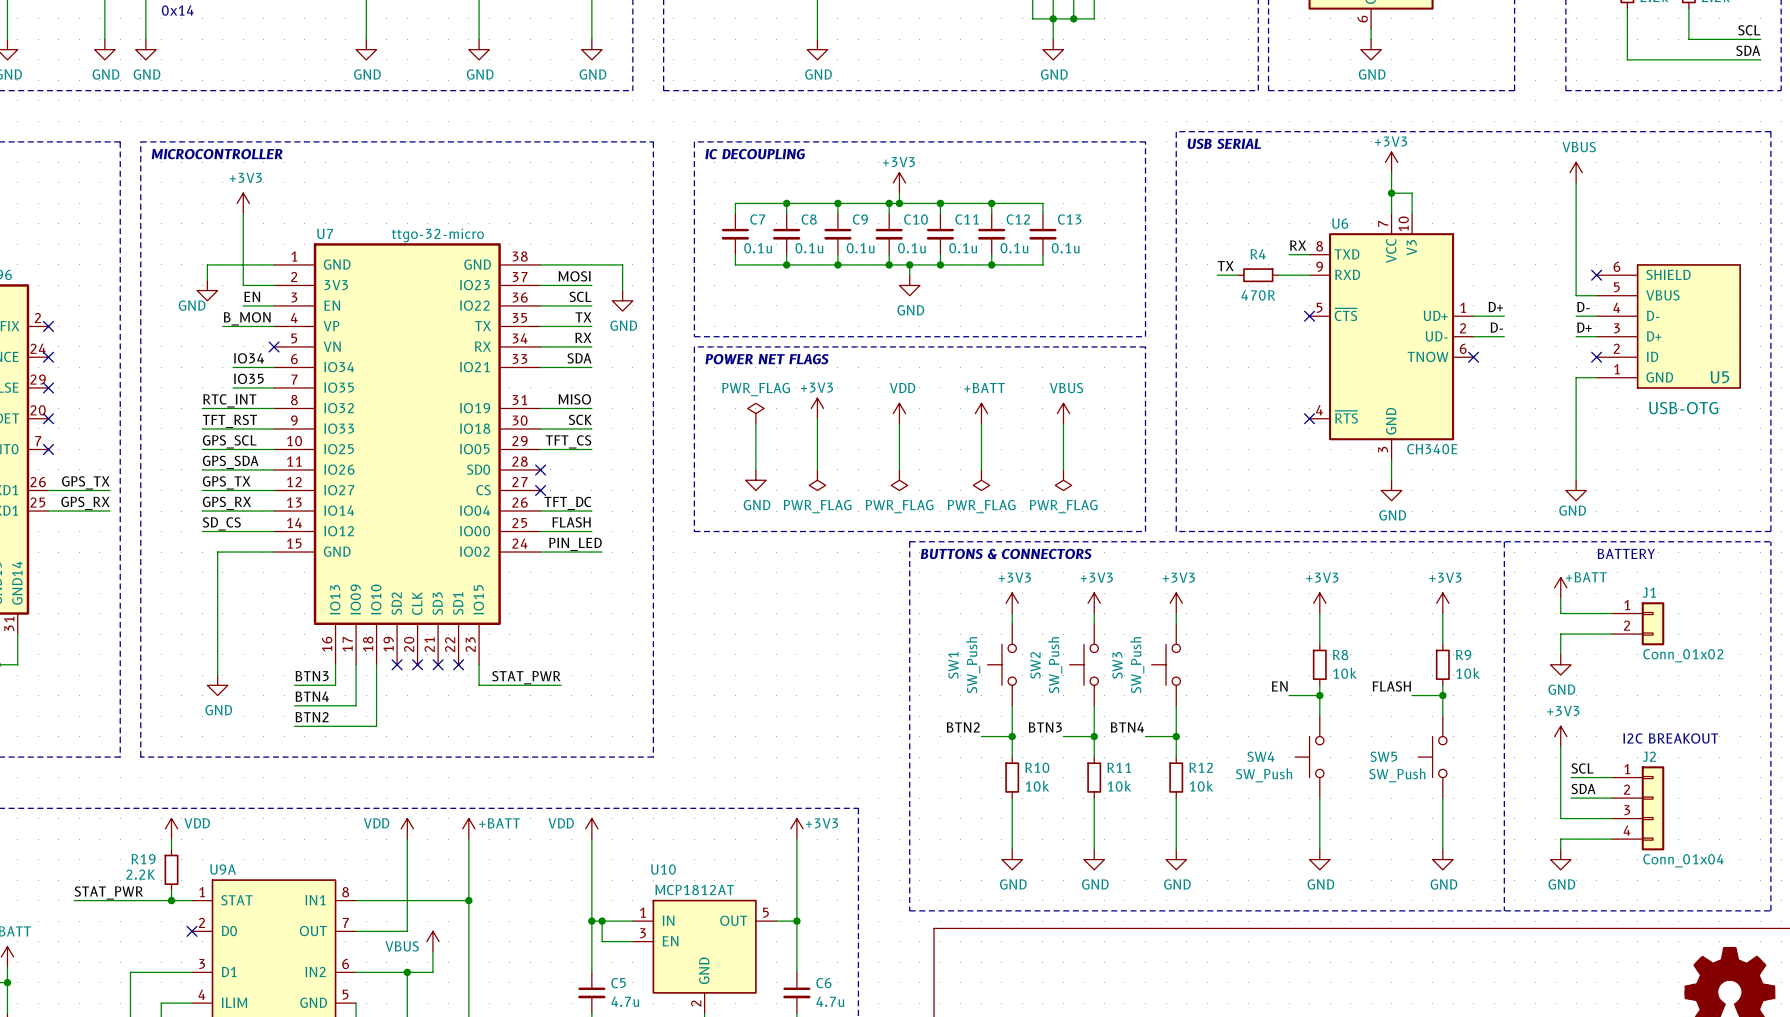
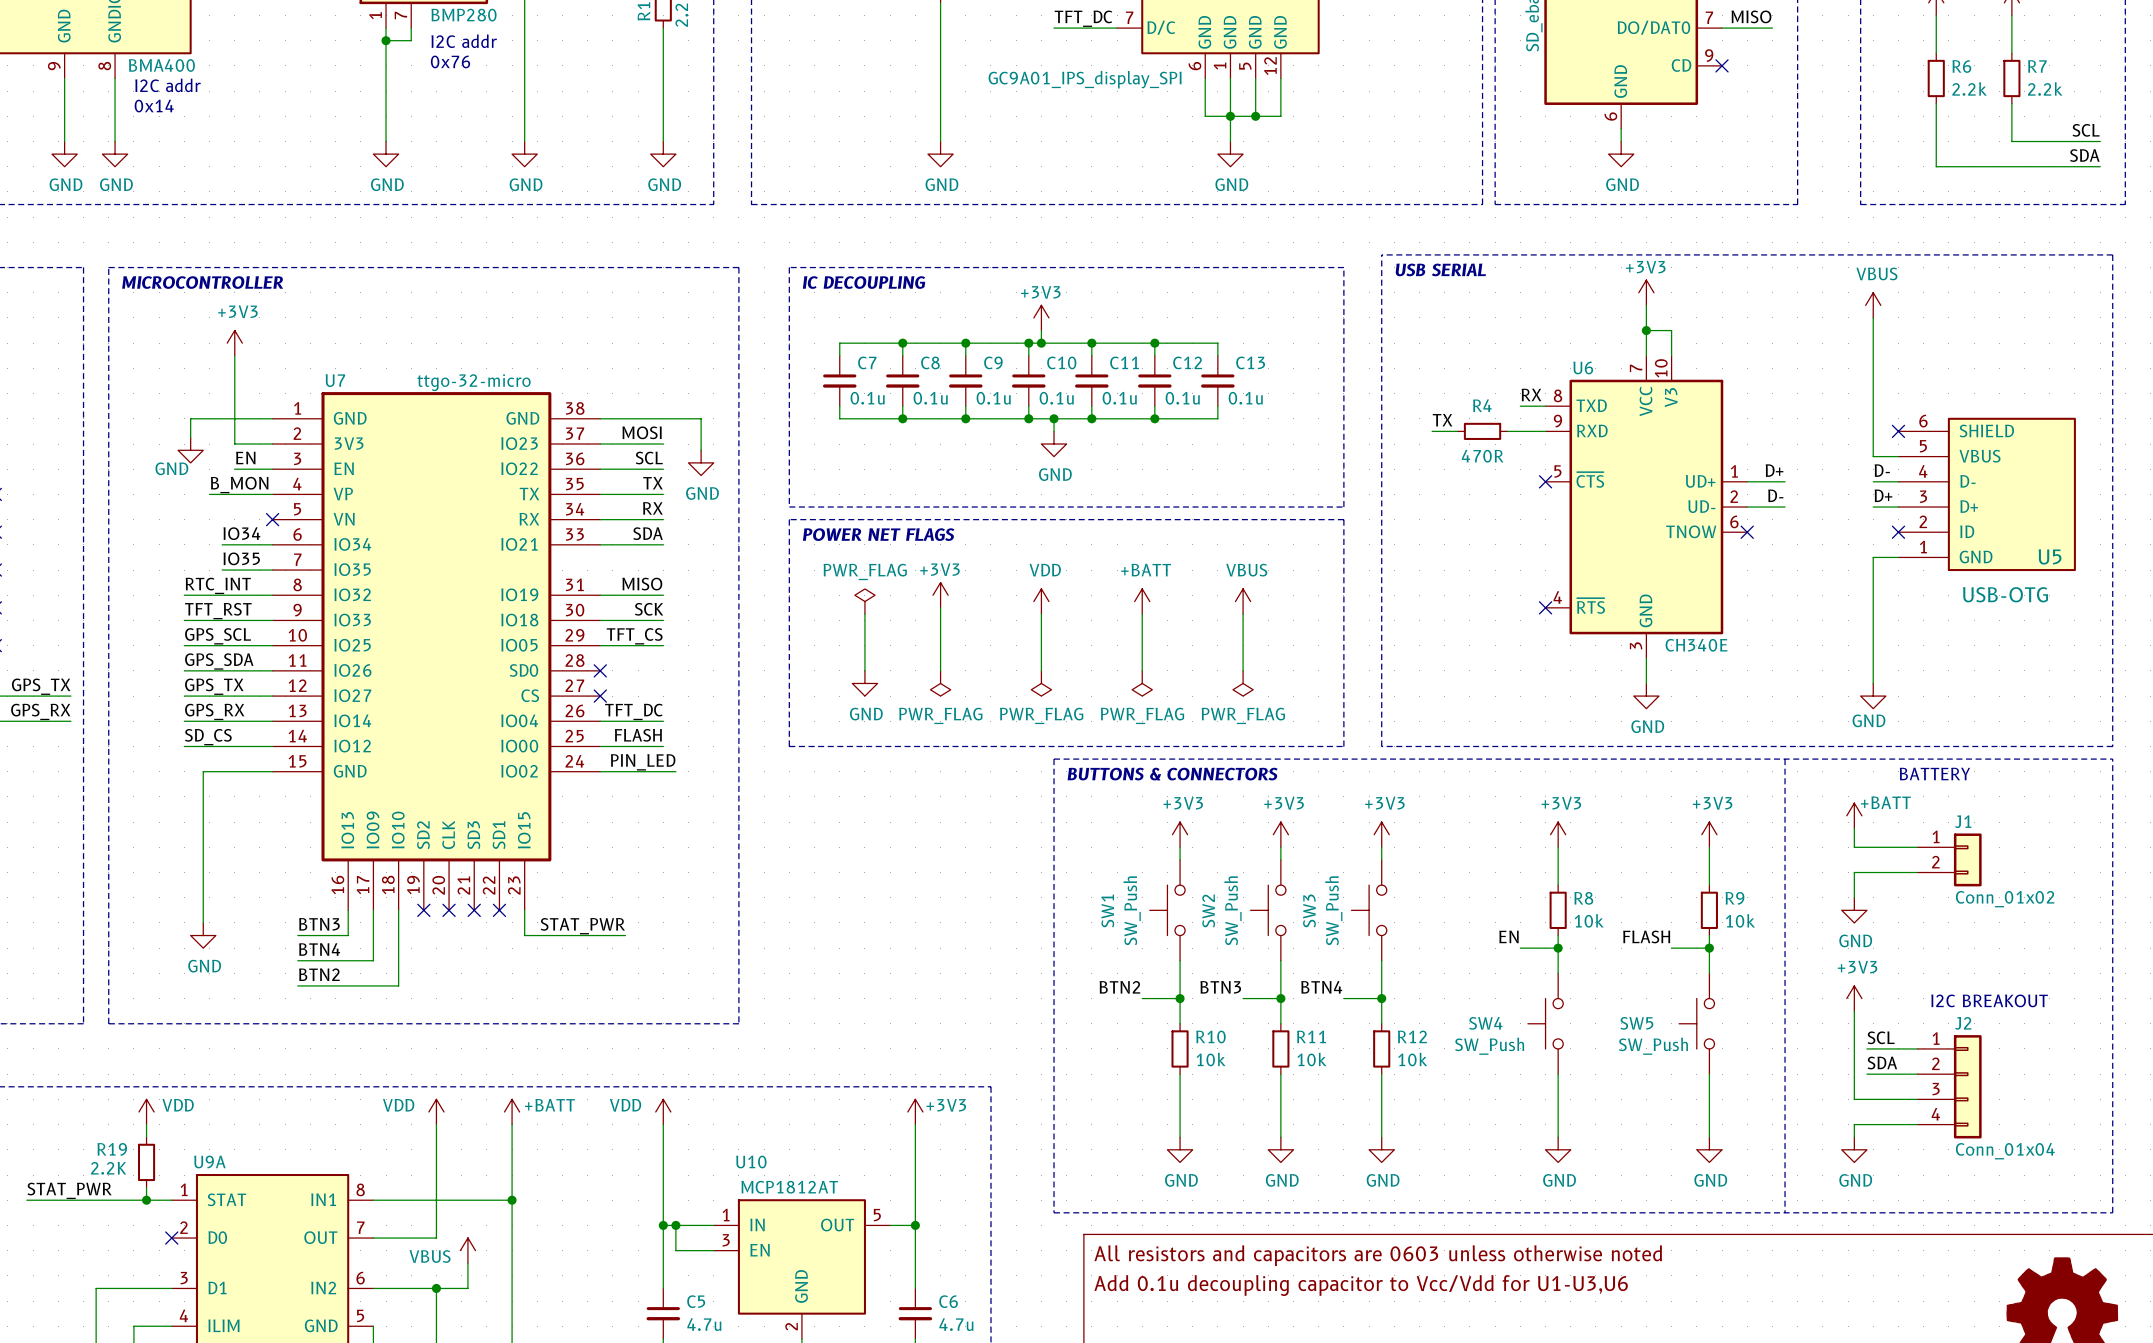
title block: none -> All resistors and capacitors are 0603 unless otherwise noted (1378, 1255)
title block: none -> Add 0.1u decoupling capacitor to Vcc/Vdd for U1-U3,U6 (1361, 1285)

